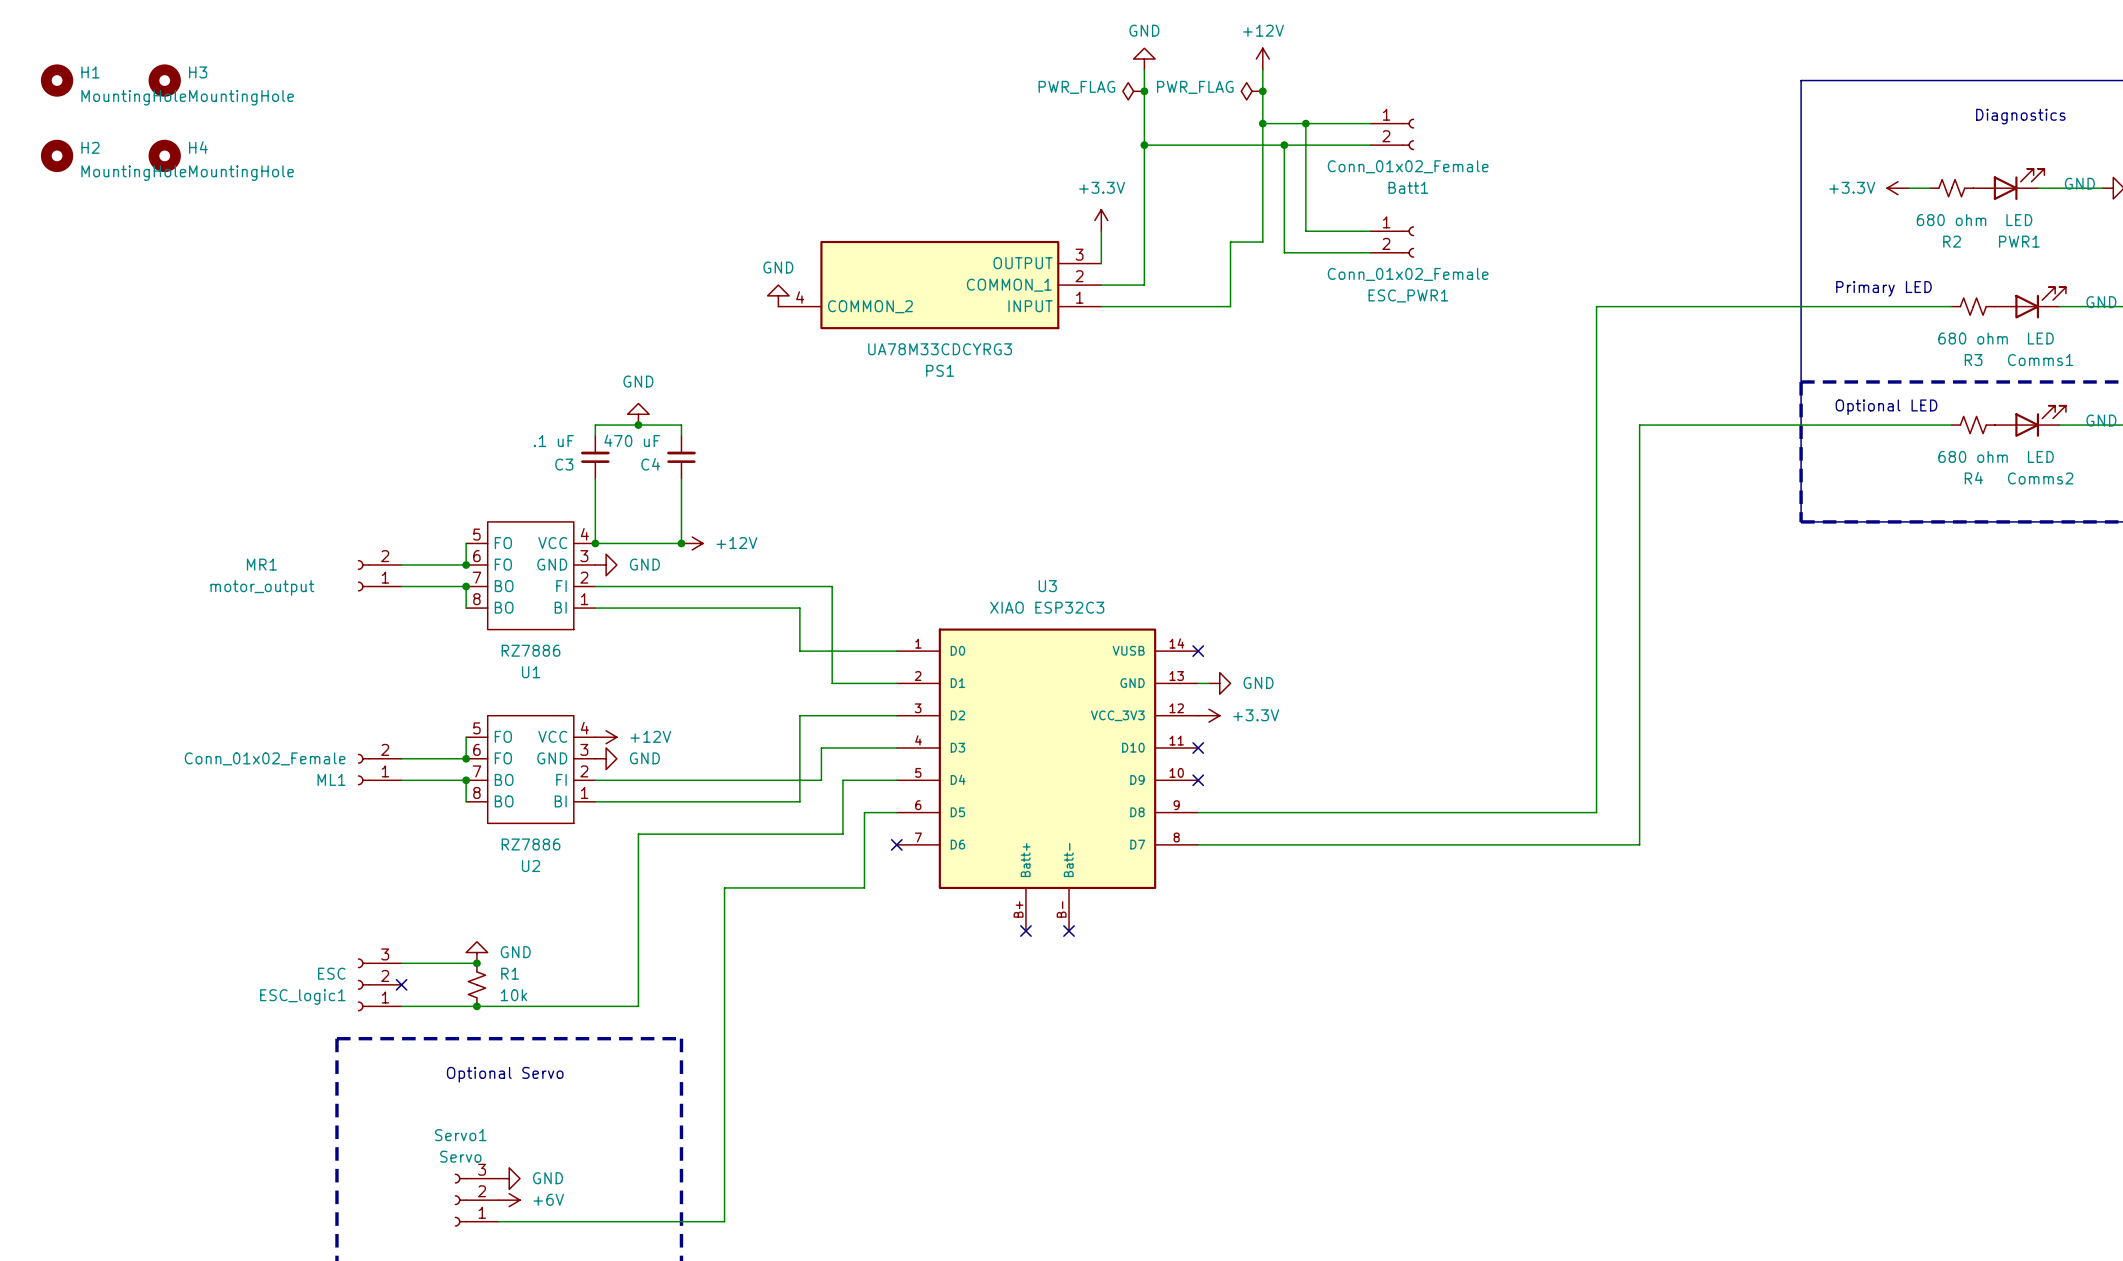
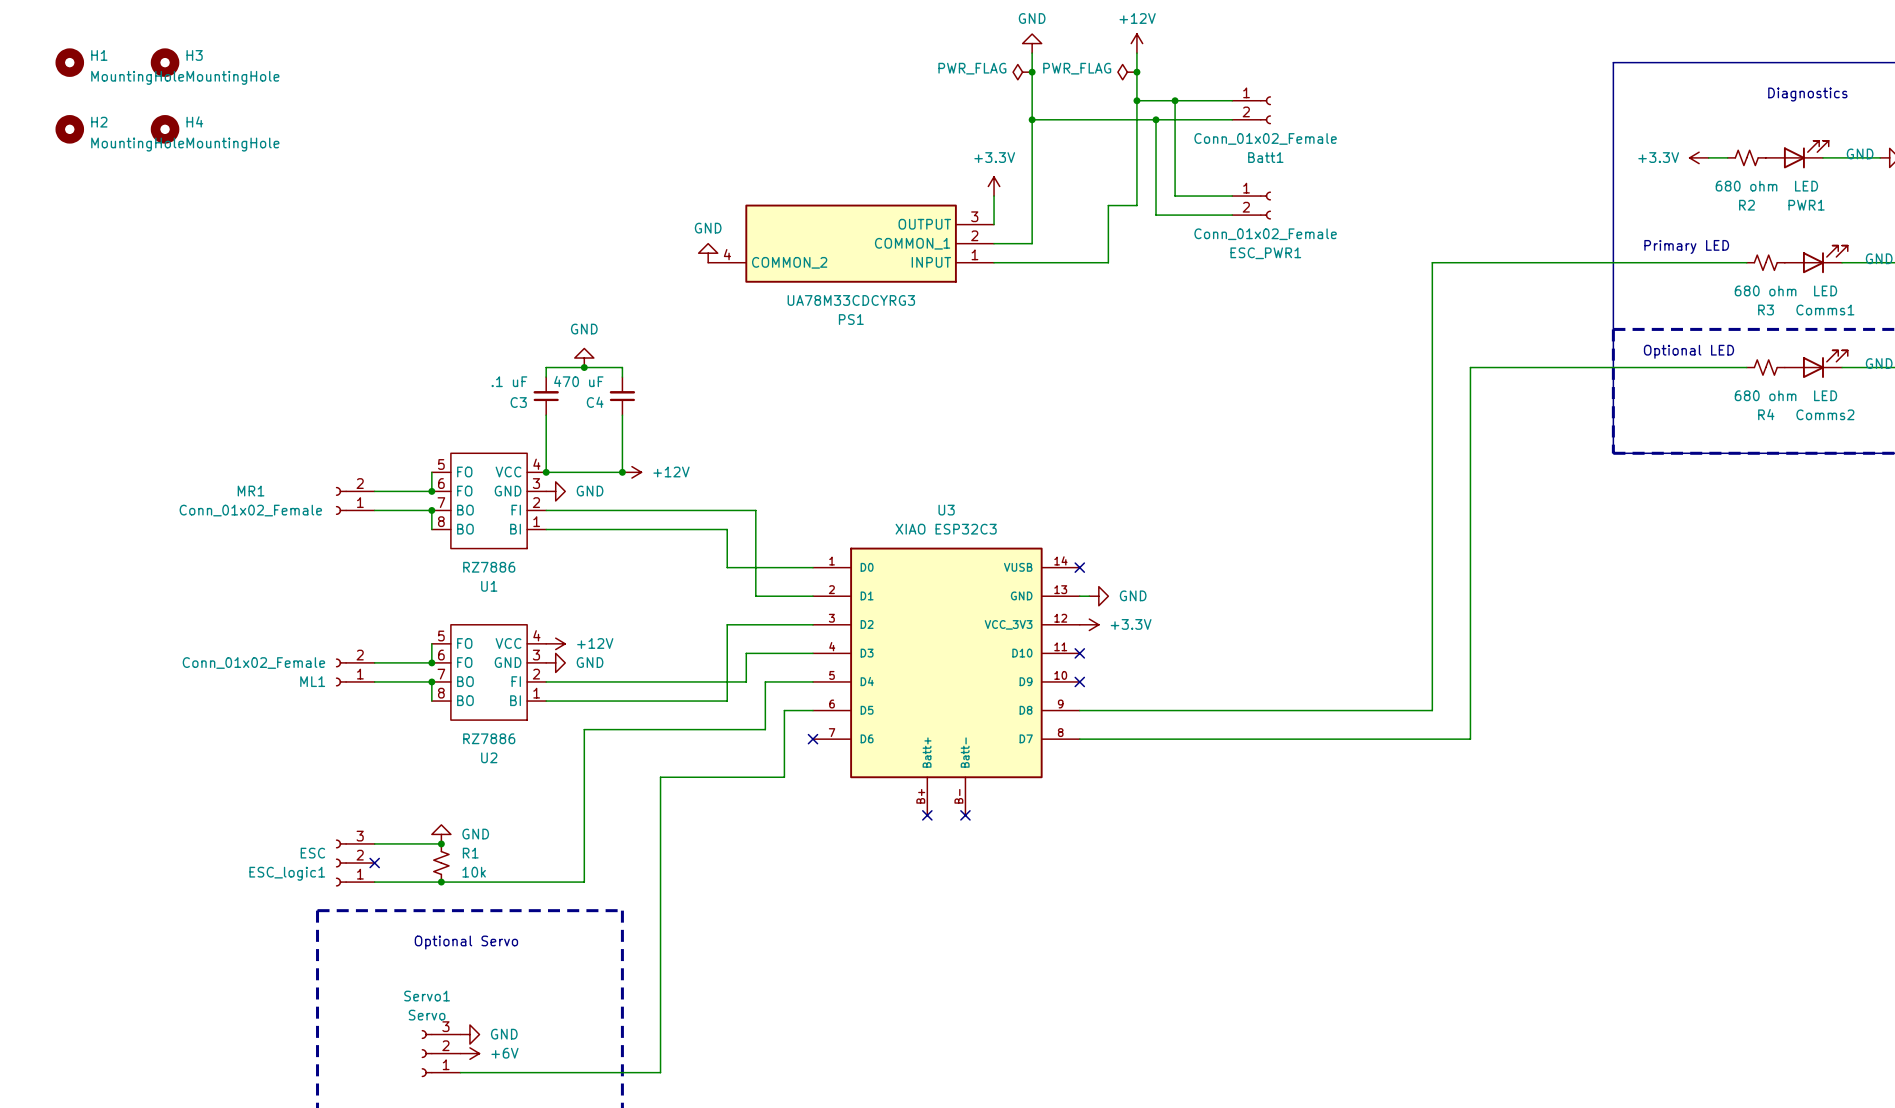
MR1 value: motor_output (262, 587) -> Conn_01x02_Female (250, 510)

